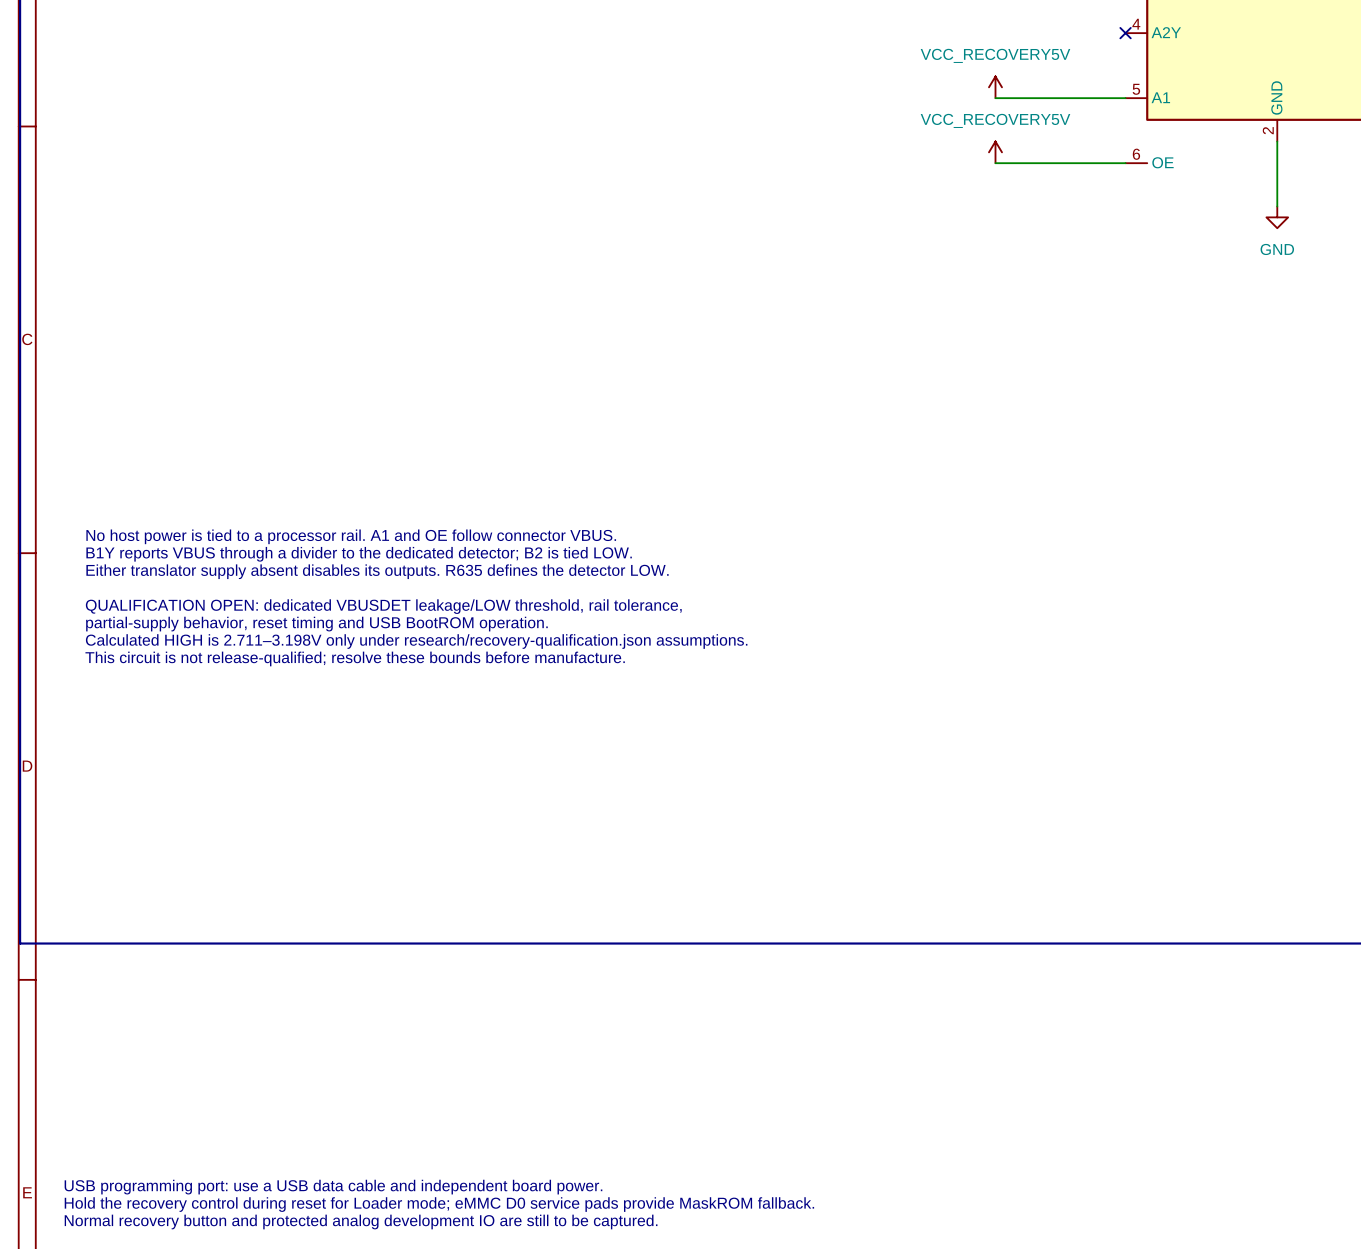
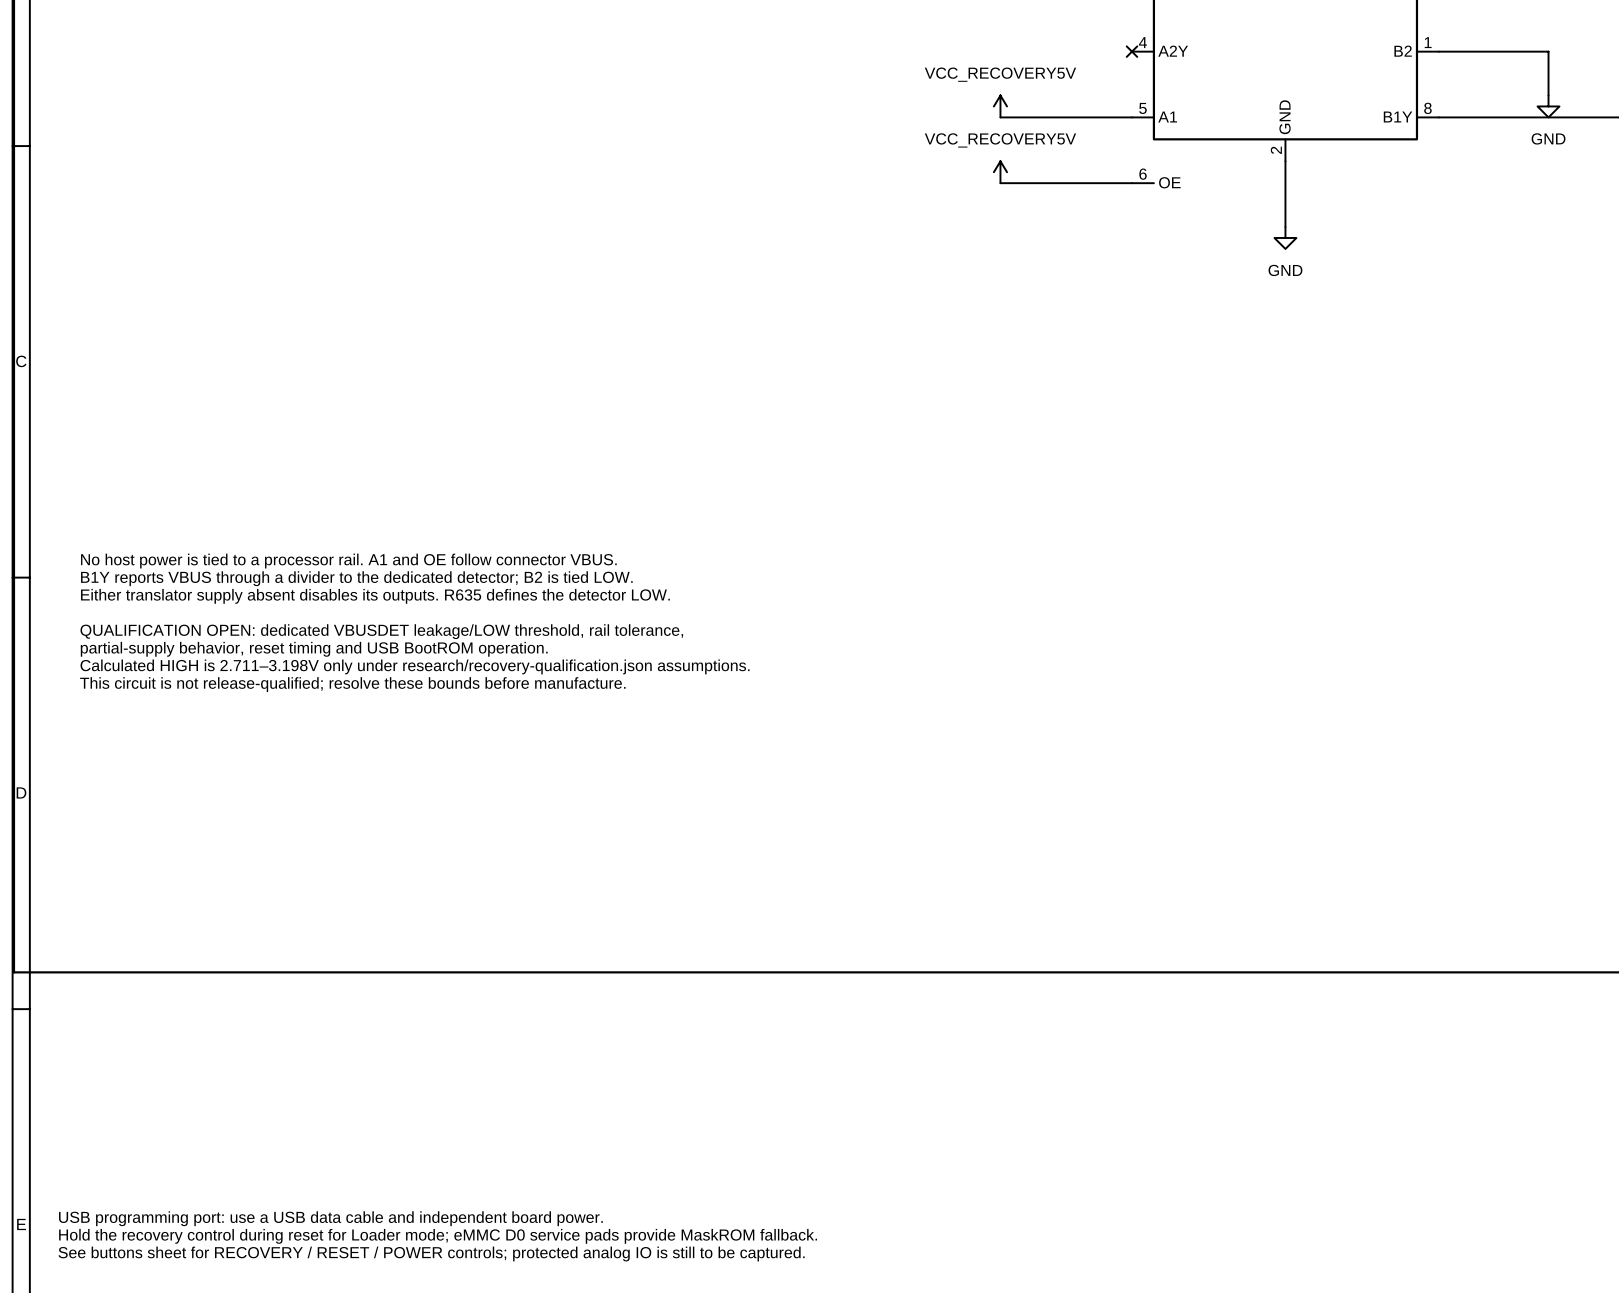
text: Normal recovery button and protected analog development IO are still to be captured. (361, 1222) -> See buttons sheet for RECOVERY / RESET / POWER controls; protected analog IO is still to be captured. (431, 1254)

